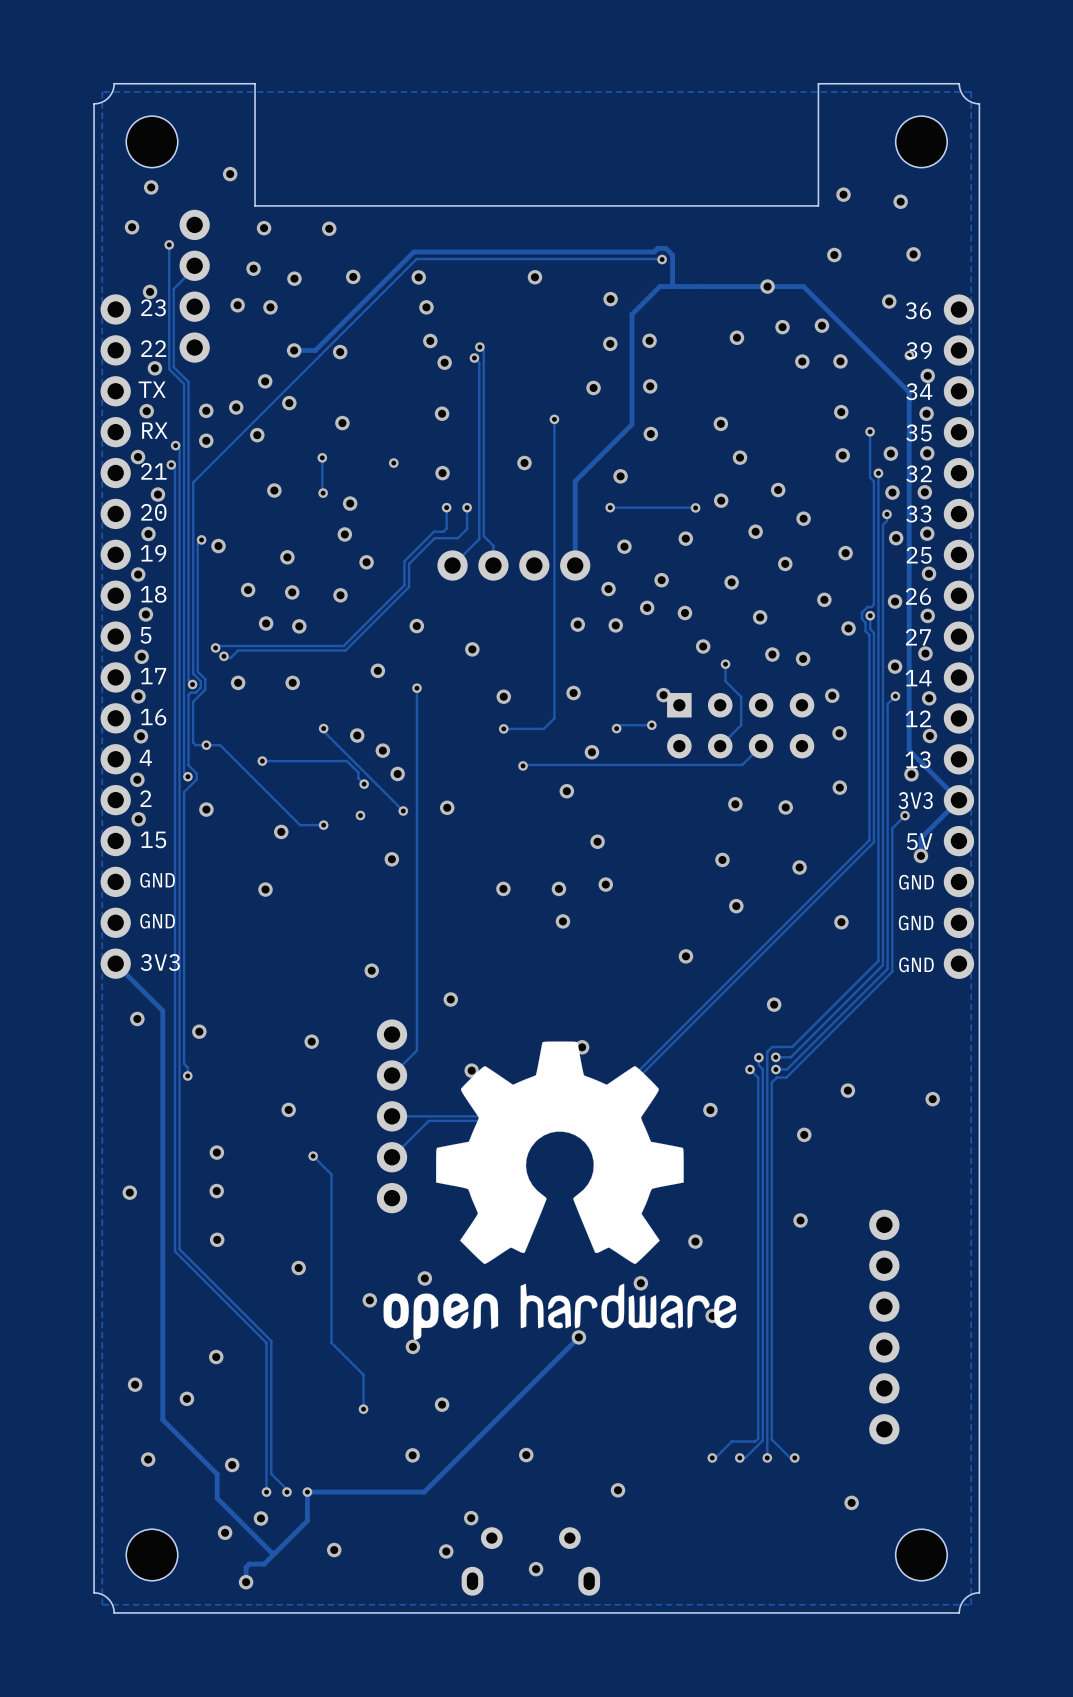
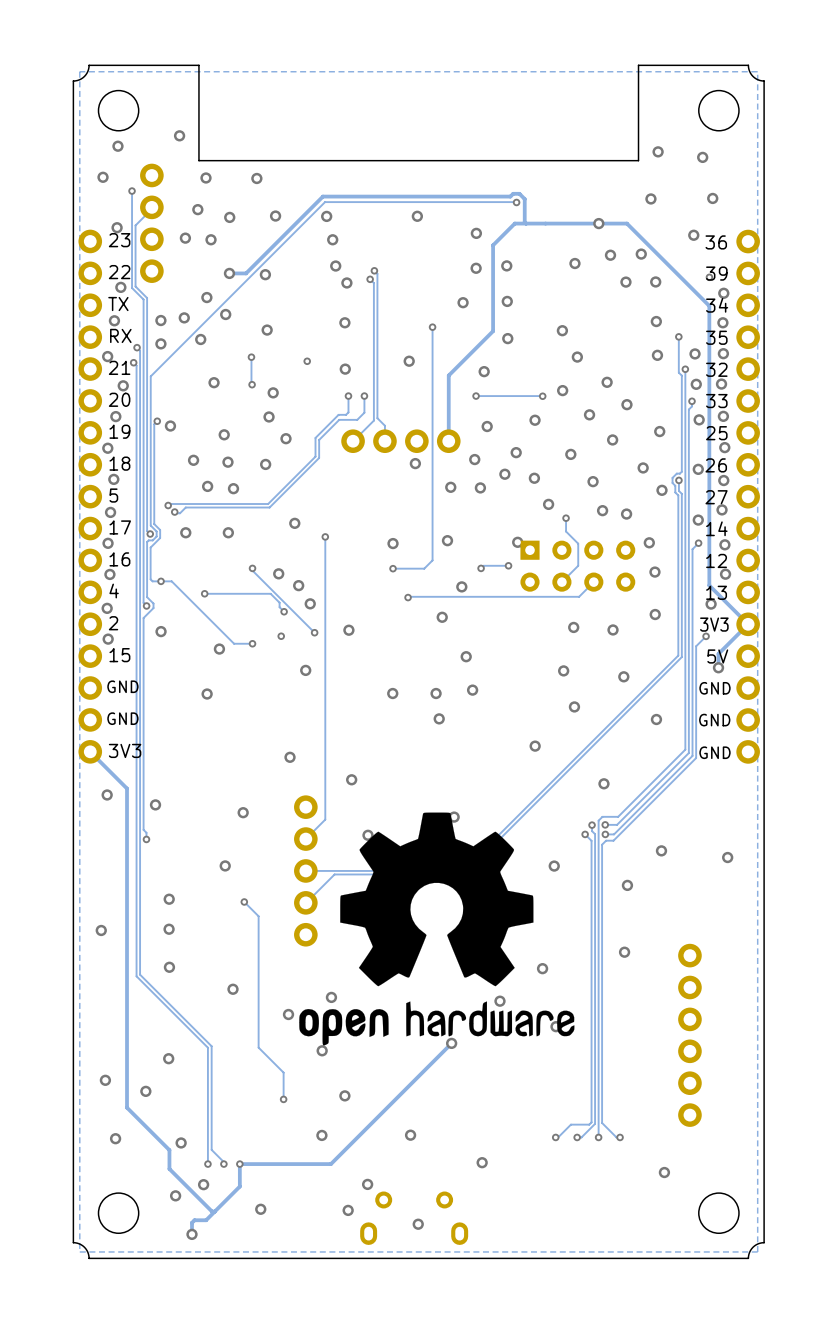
via: none -> (415, 463)
via: (416, 626) -> none
via: (472, 649) -> none

